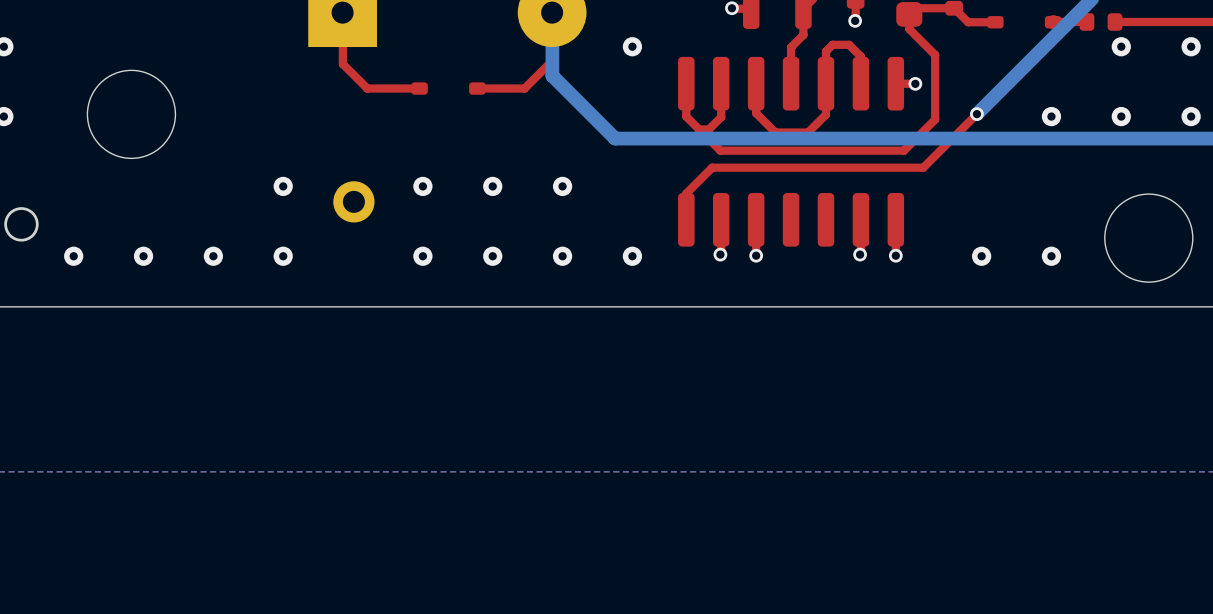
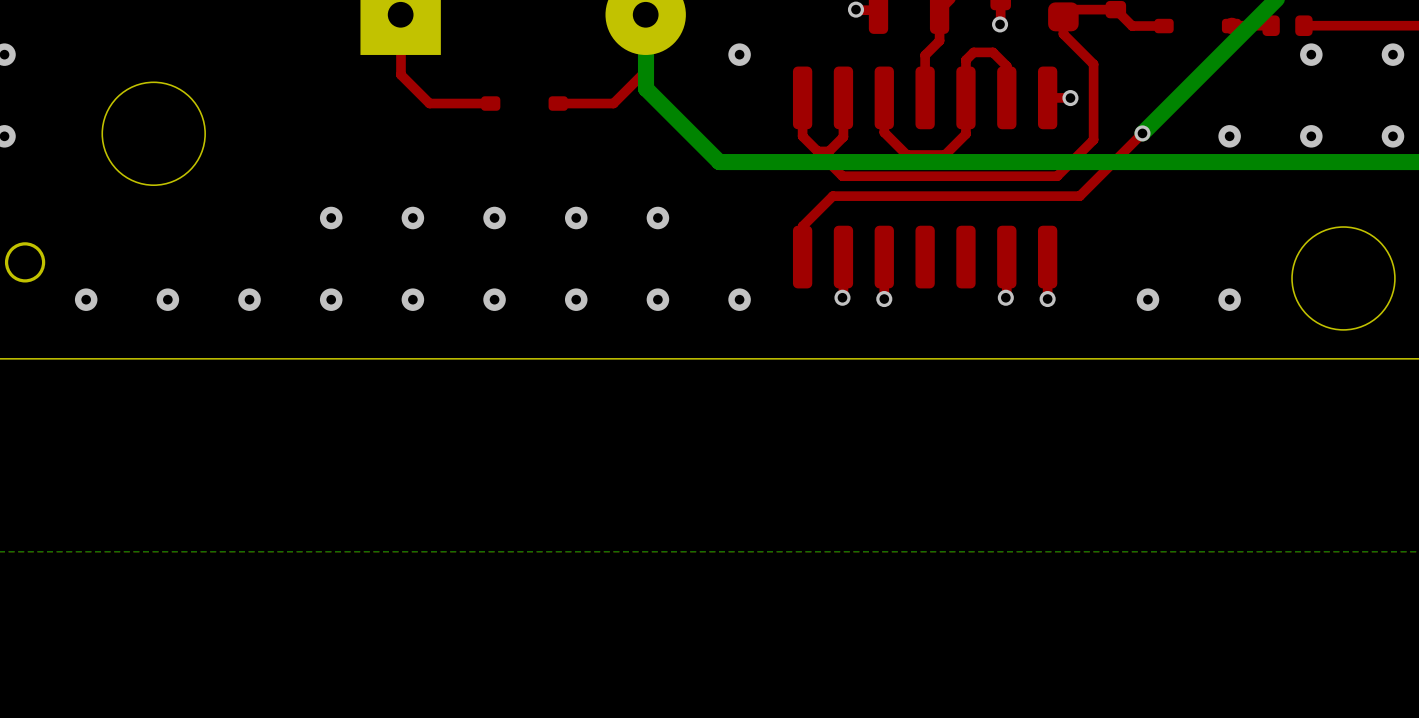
via: none -> (412, 218)
part: (353, 201) -> none
via: none -> (412, 299)

